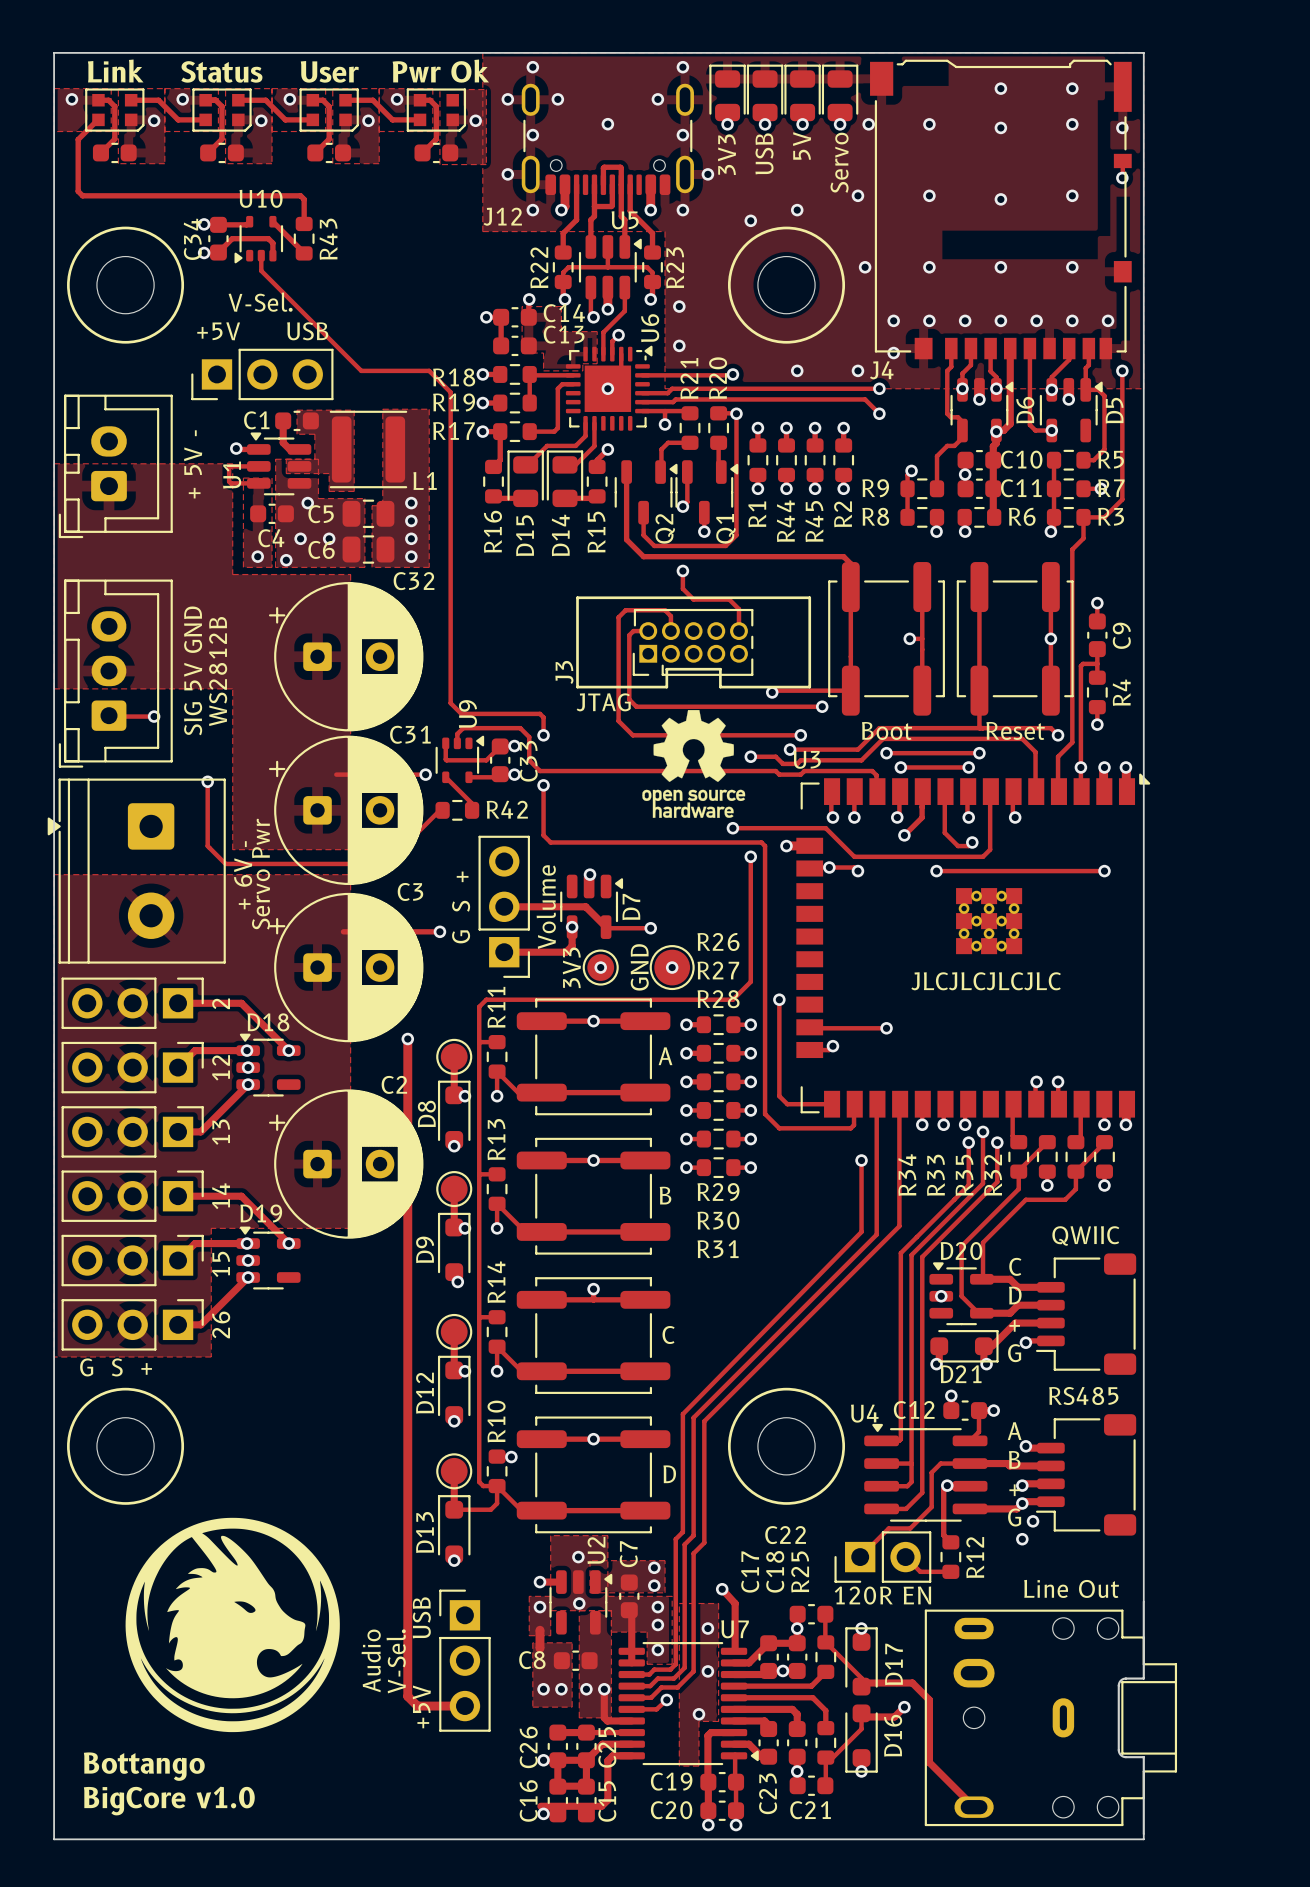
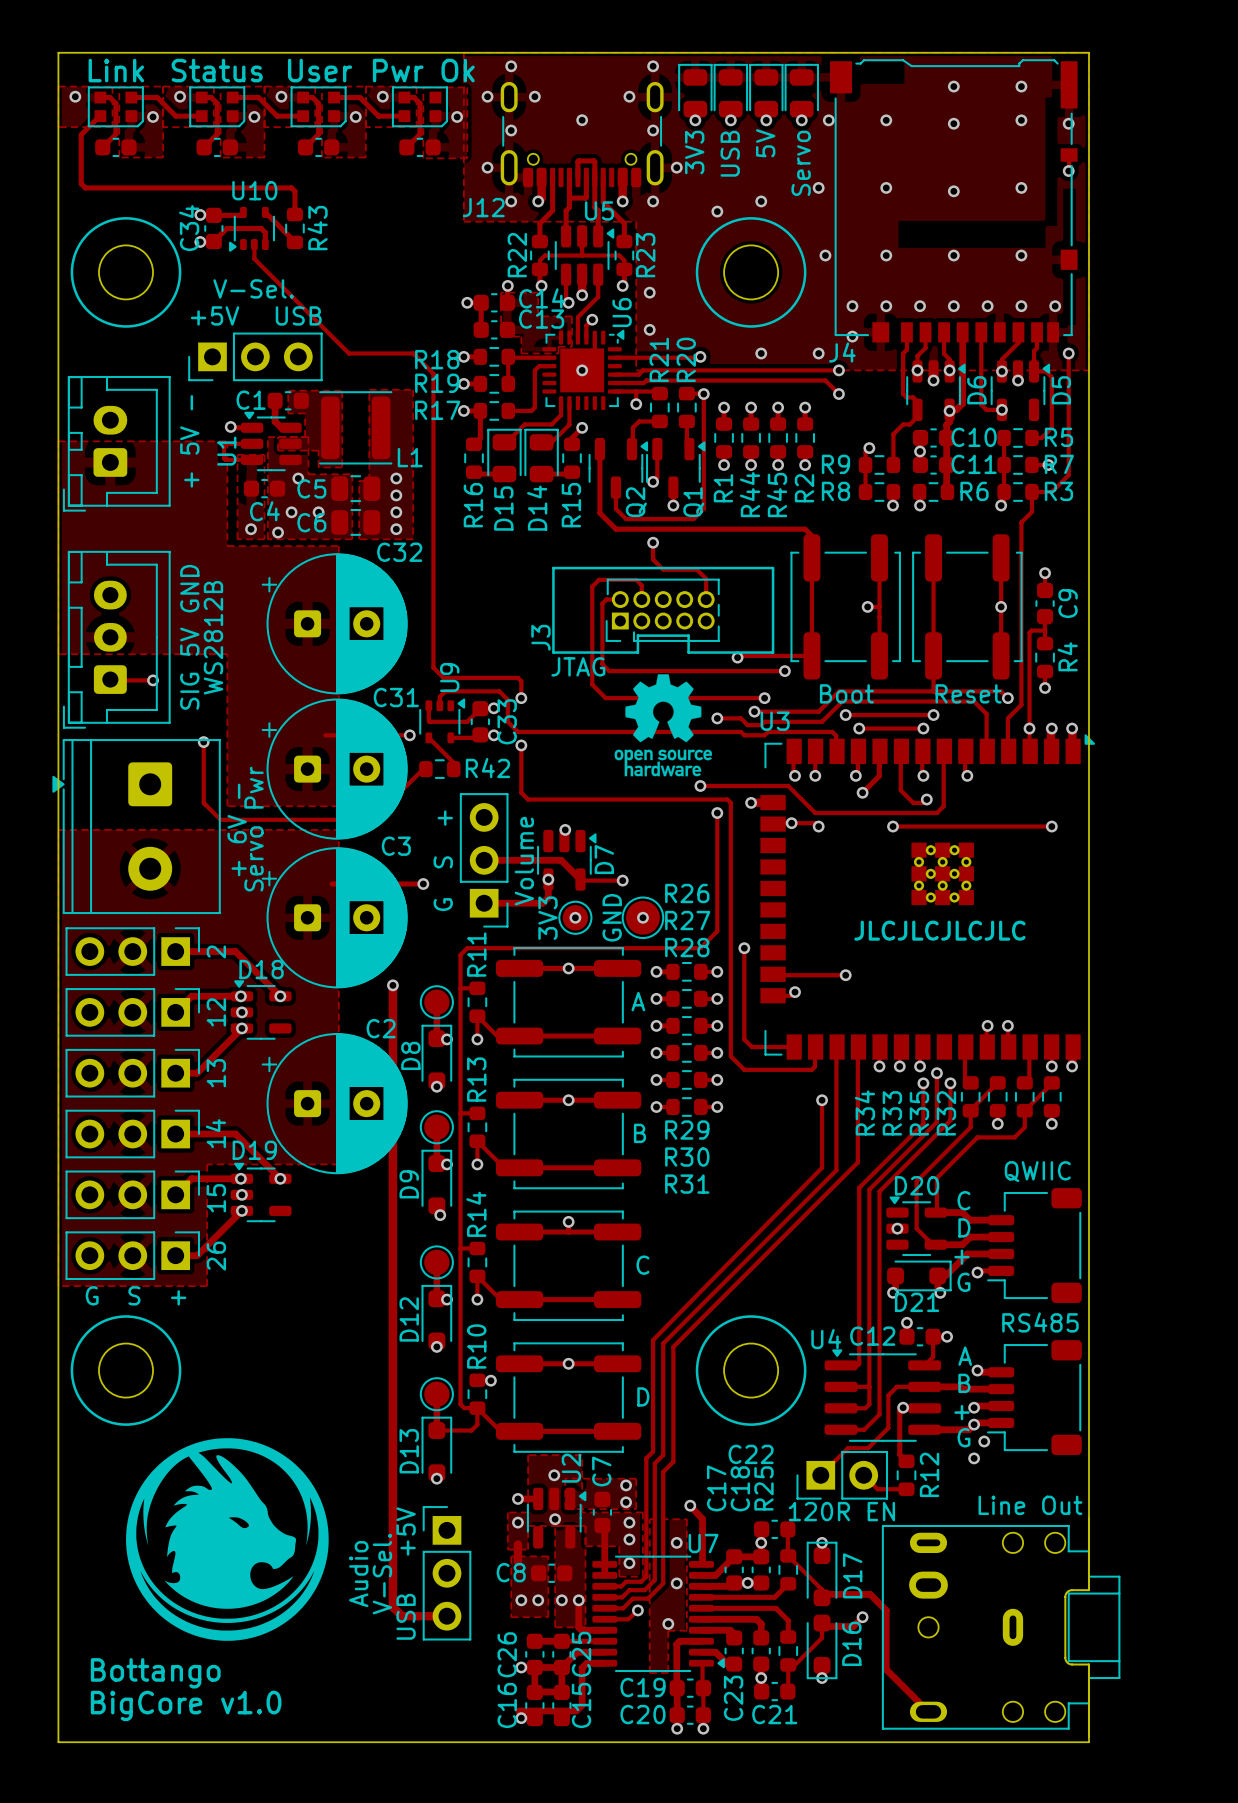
text: USB (421, 1617) -> +5V (406, 1531)
text: +5V (421, 1706) -> USB (406, 1616)

